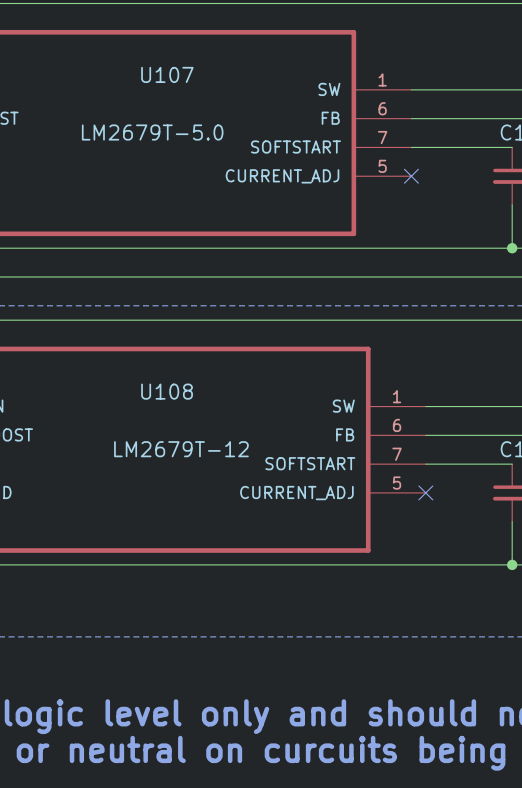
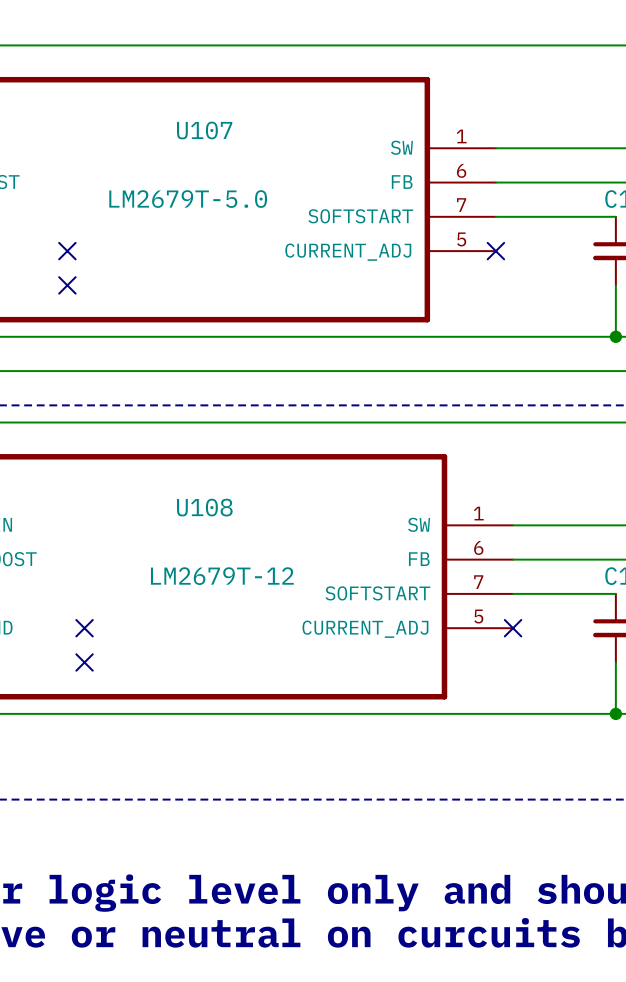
no-connect mark: none -> (67, 251)
no-connect mark: none -> (67, 285)
no-connect mark: none -> (84, 628)
no-connect mark: none -> (84, 662)

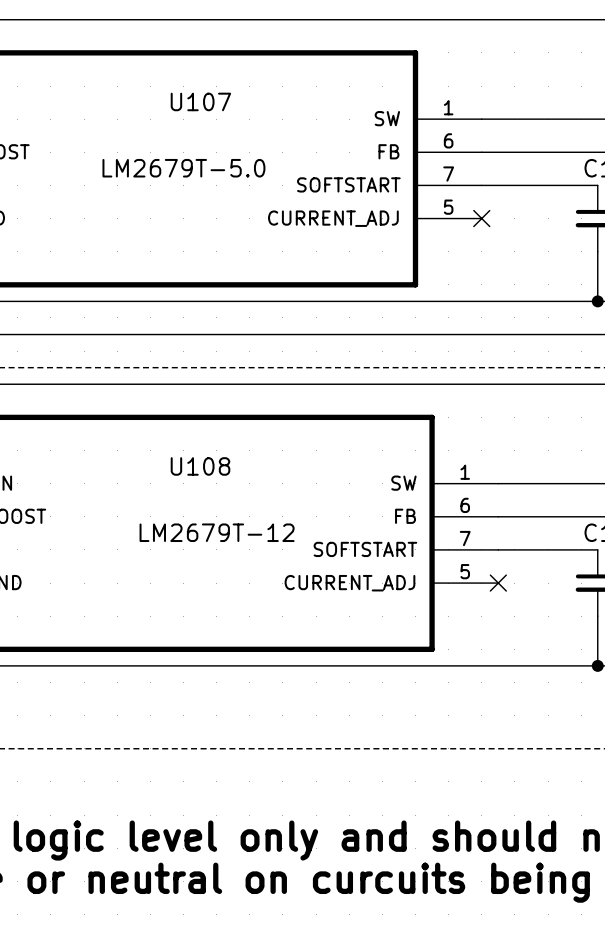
no-connect mark: (67, 251) -> none
no-connect mark: (67, 285) -> none
no-connect mark: (84, 628) -> none
no-connect mark: (84, 662) -> none

